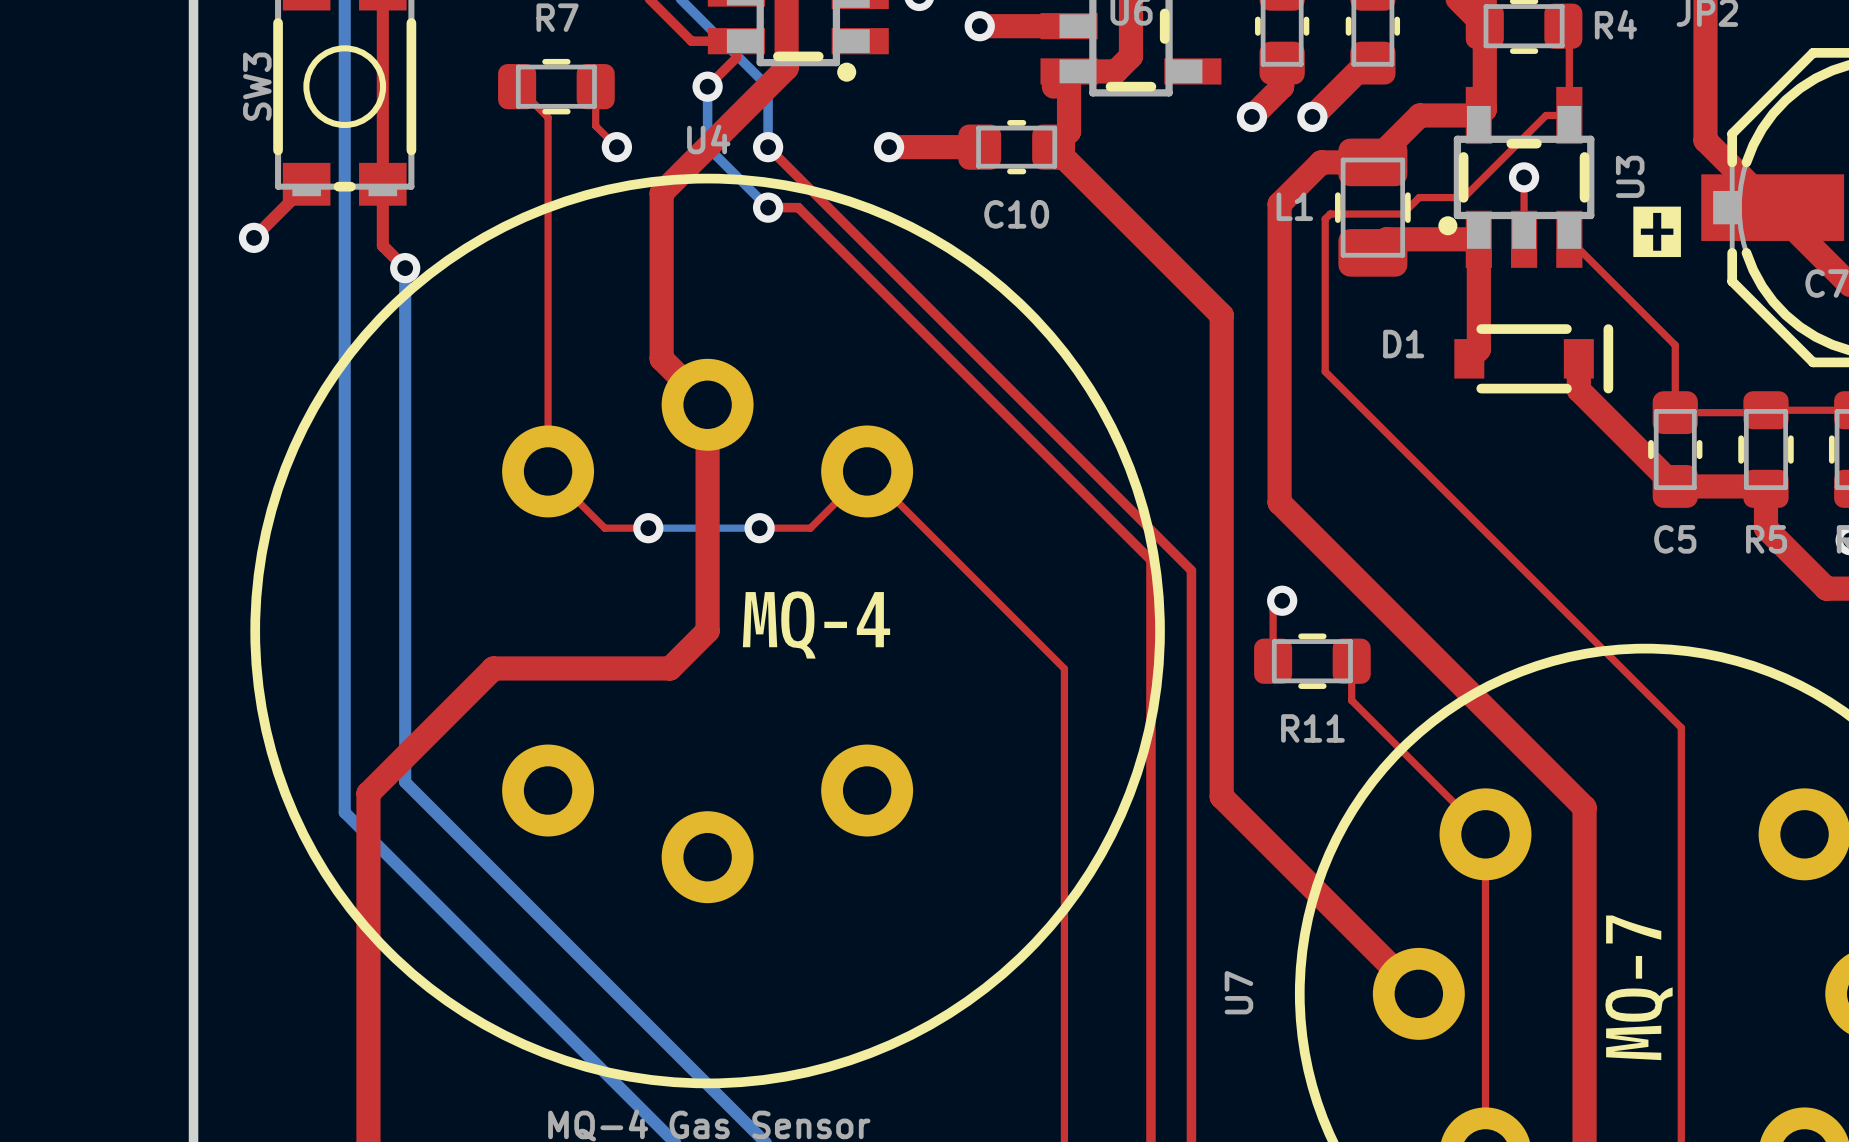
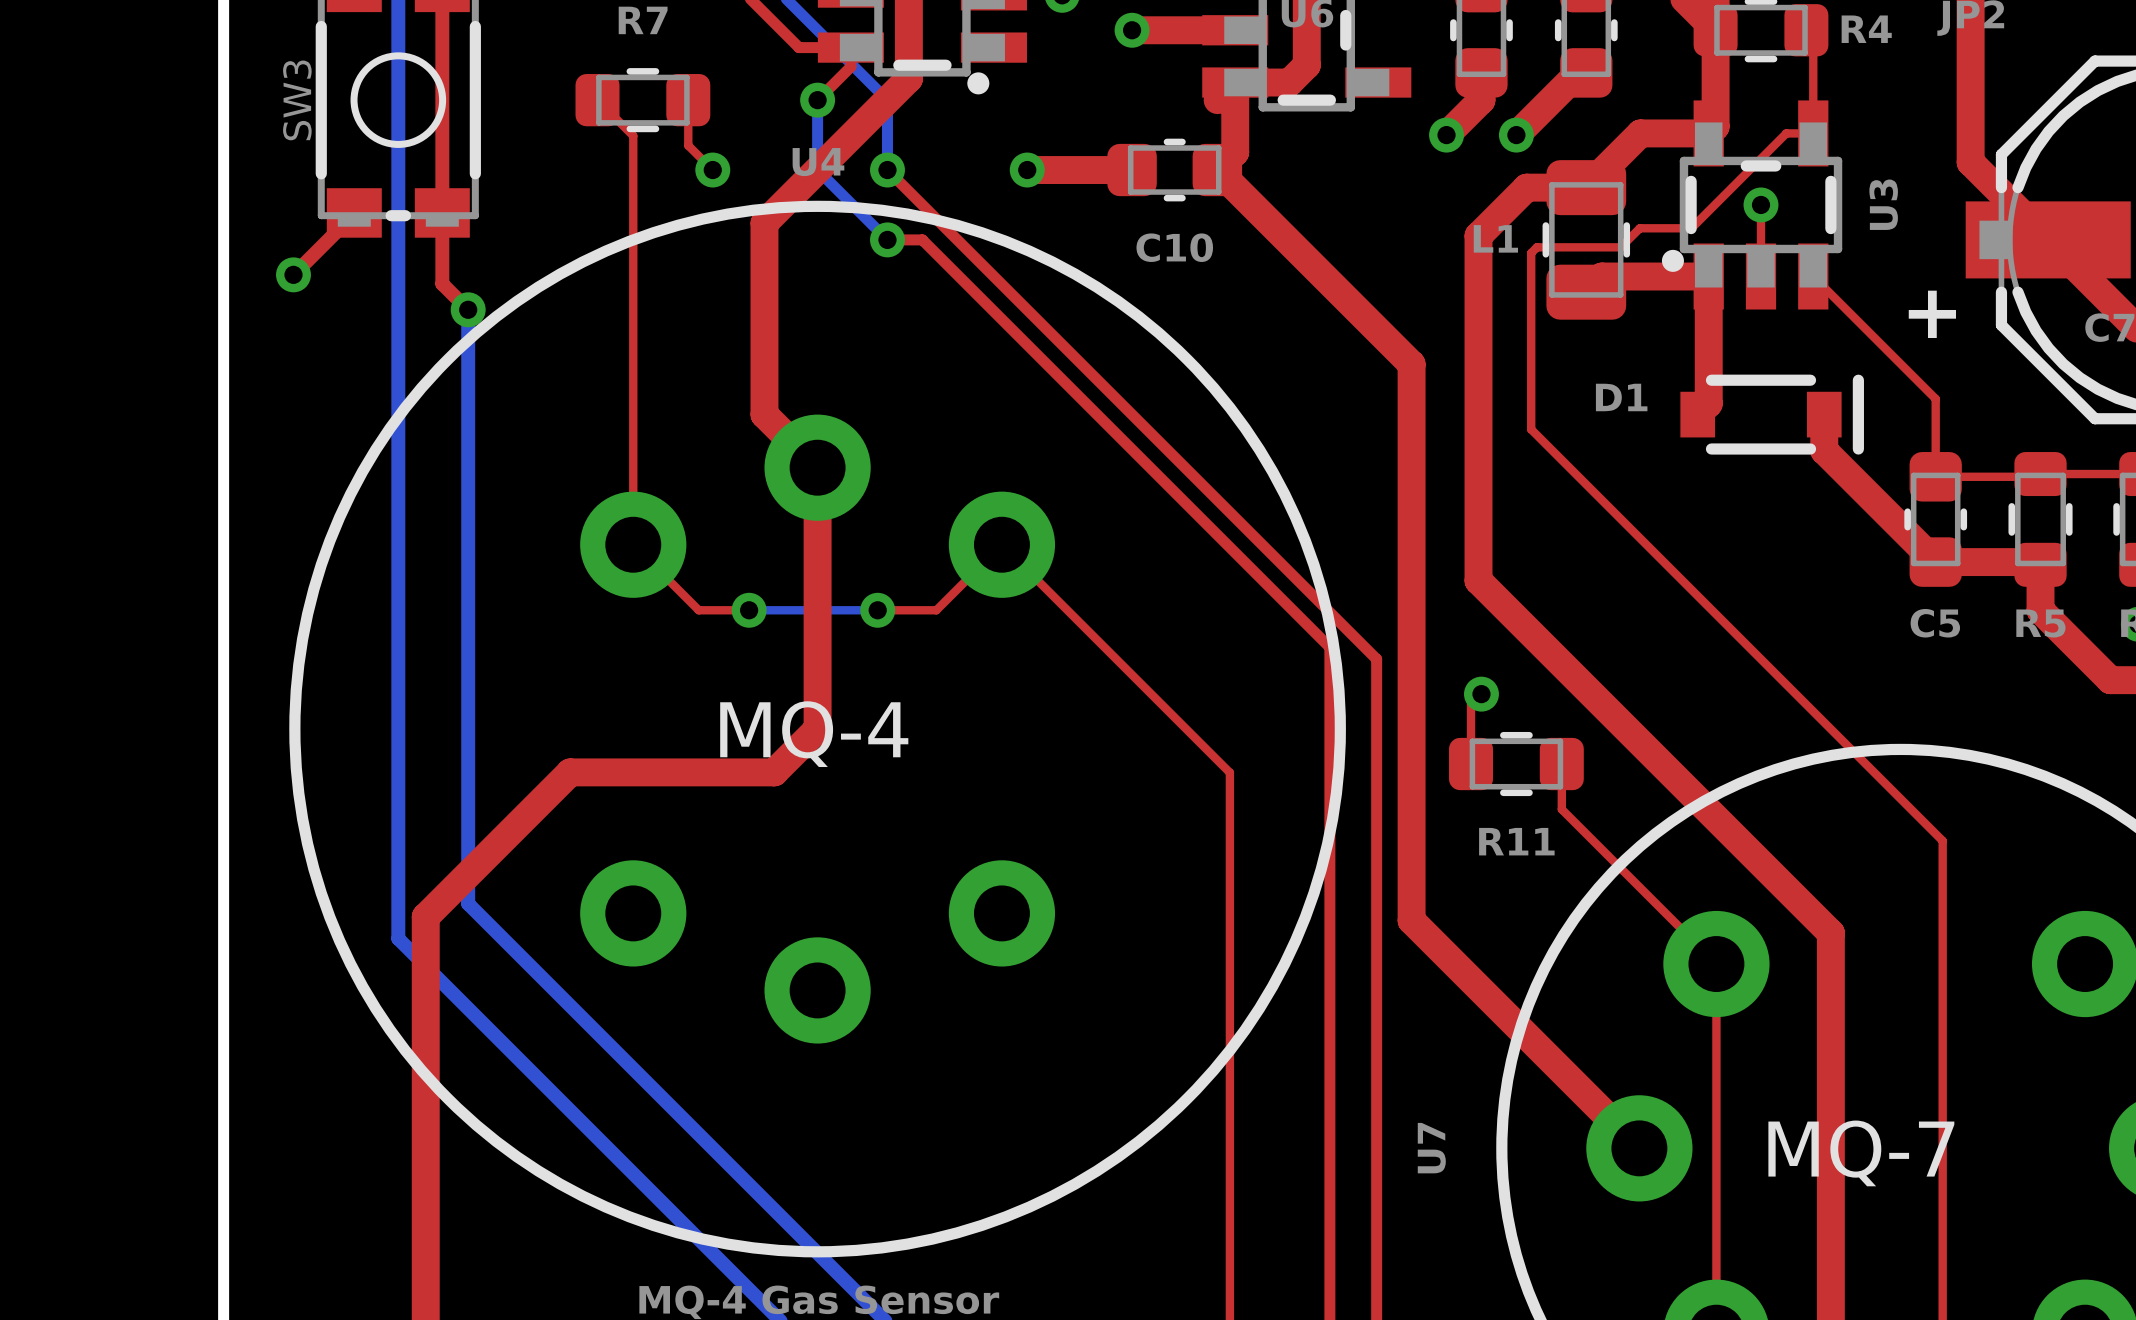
drawing: [1633, 206, 1681, 258] -> none
text: none -> + (1932, 314)
drawing: [742, 591, 891, 659] -> none
text: none -> MQ-4 (814, 734)
drawing: [1605, 915, 1673, 1061] -> none
text: none -> MQ-7 (1861, 1153)

